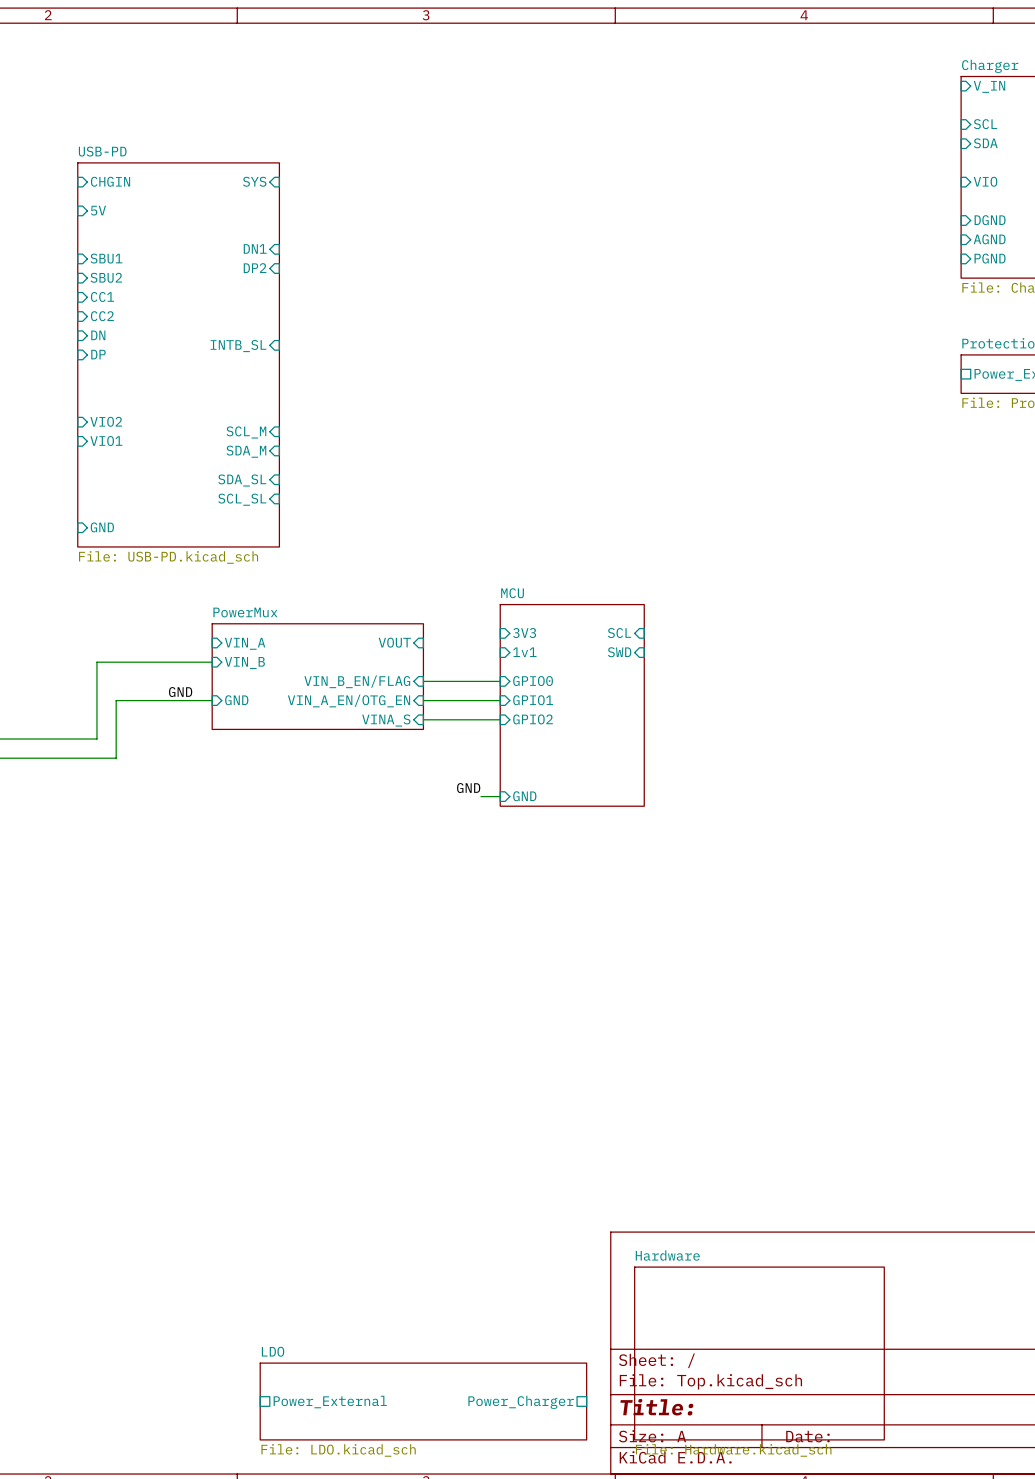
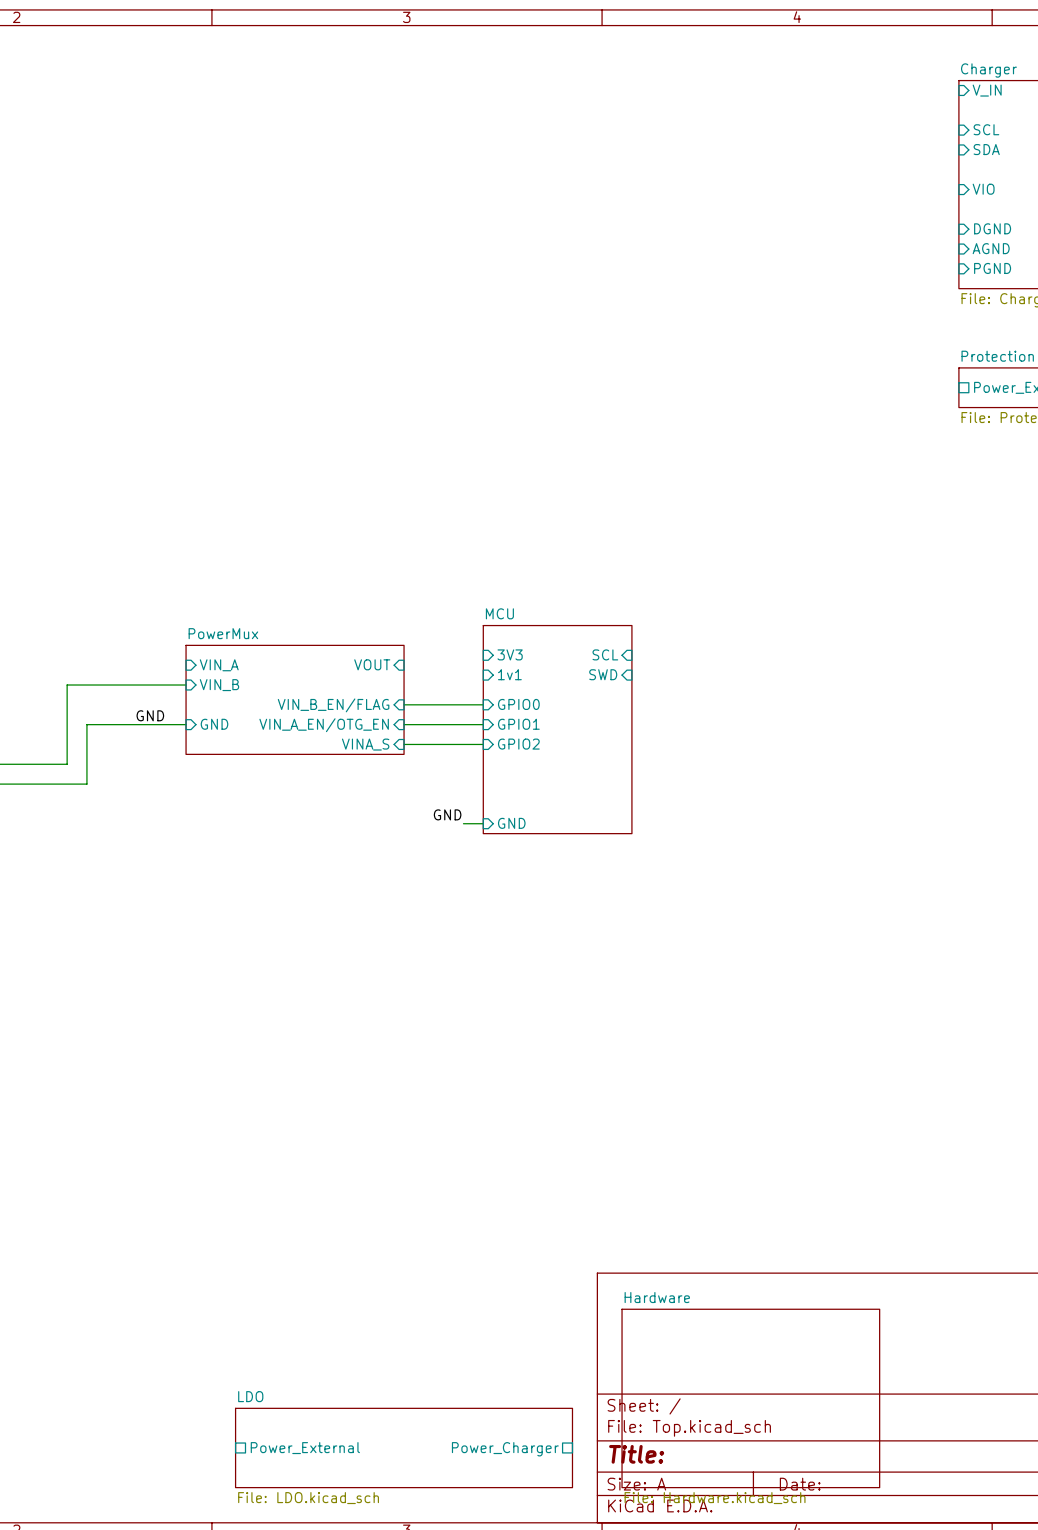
sheet pin: CHGIN (110, 181) -> none
sheet pin: SYS (254, 181) -> none
sheet pin: 5V (98, 210) -> none
sheet pin: DN1 (255, 248) -> none
sheet pin: SBU1 (106, 258) -> none
sheet pin: DP2 (255, 268) -> none
sheet pin: SBU2 (106, 277) -> none
sheet pin: CC1 (102, 296) -> none
sheet pin: CC2 (102, 316) -> none
sheet pin: DN (98, 335) -> none
sheet pin: INTB_SL (238, 346) -> none
sheet pin: DP (98, 354) -> none
sheet USB-PD: File: USB-PD.kicad_sch (178, 354) -> none
sheet pin: VIO2 (106, 421) -> none
sheet pin: SCL_M (246, 432) -> none
sheet pin: VIO1 (106, 441) -> none
sheet pin: SDA_M (246, 451) -> none
sheet pin: SDA_SL (242, 480) -> none
sheet pin: SCL_SL (242, 499) -> none
sheet pin: GND (102, 527) -> none

